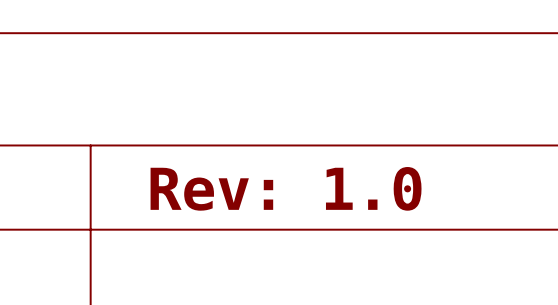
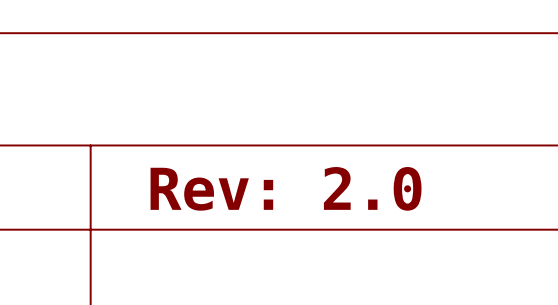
title block: Rev: 1.0 (286, 188) -> Rev: 2.0 (286, 188)

